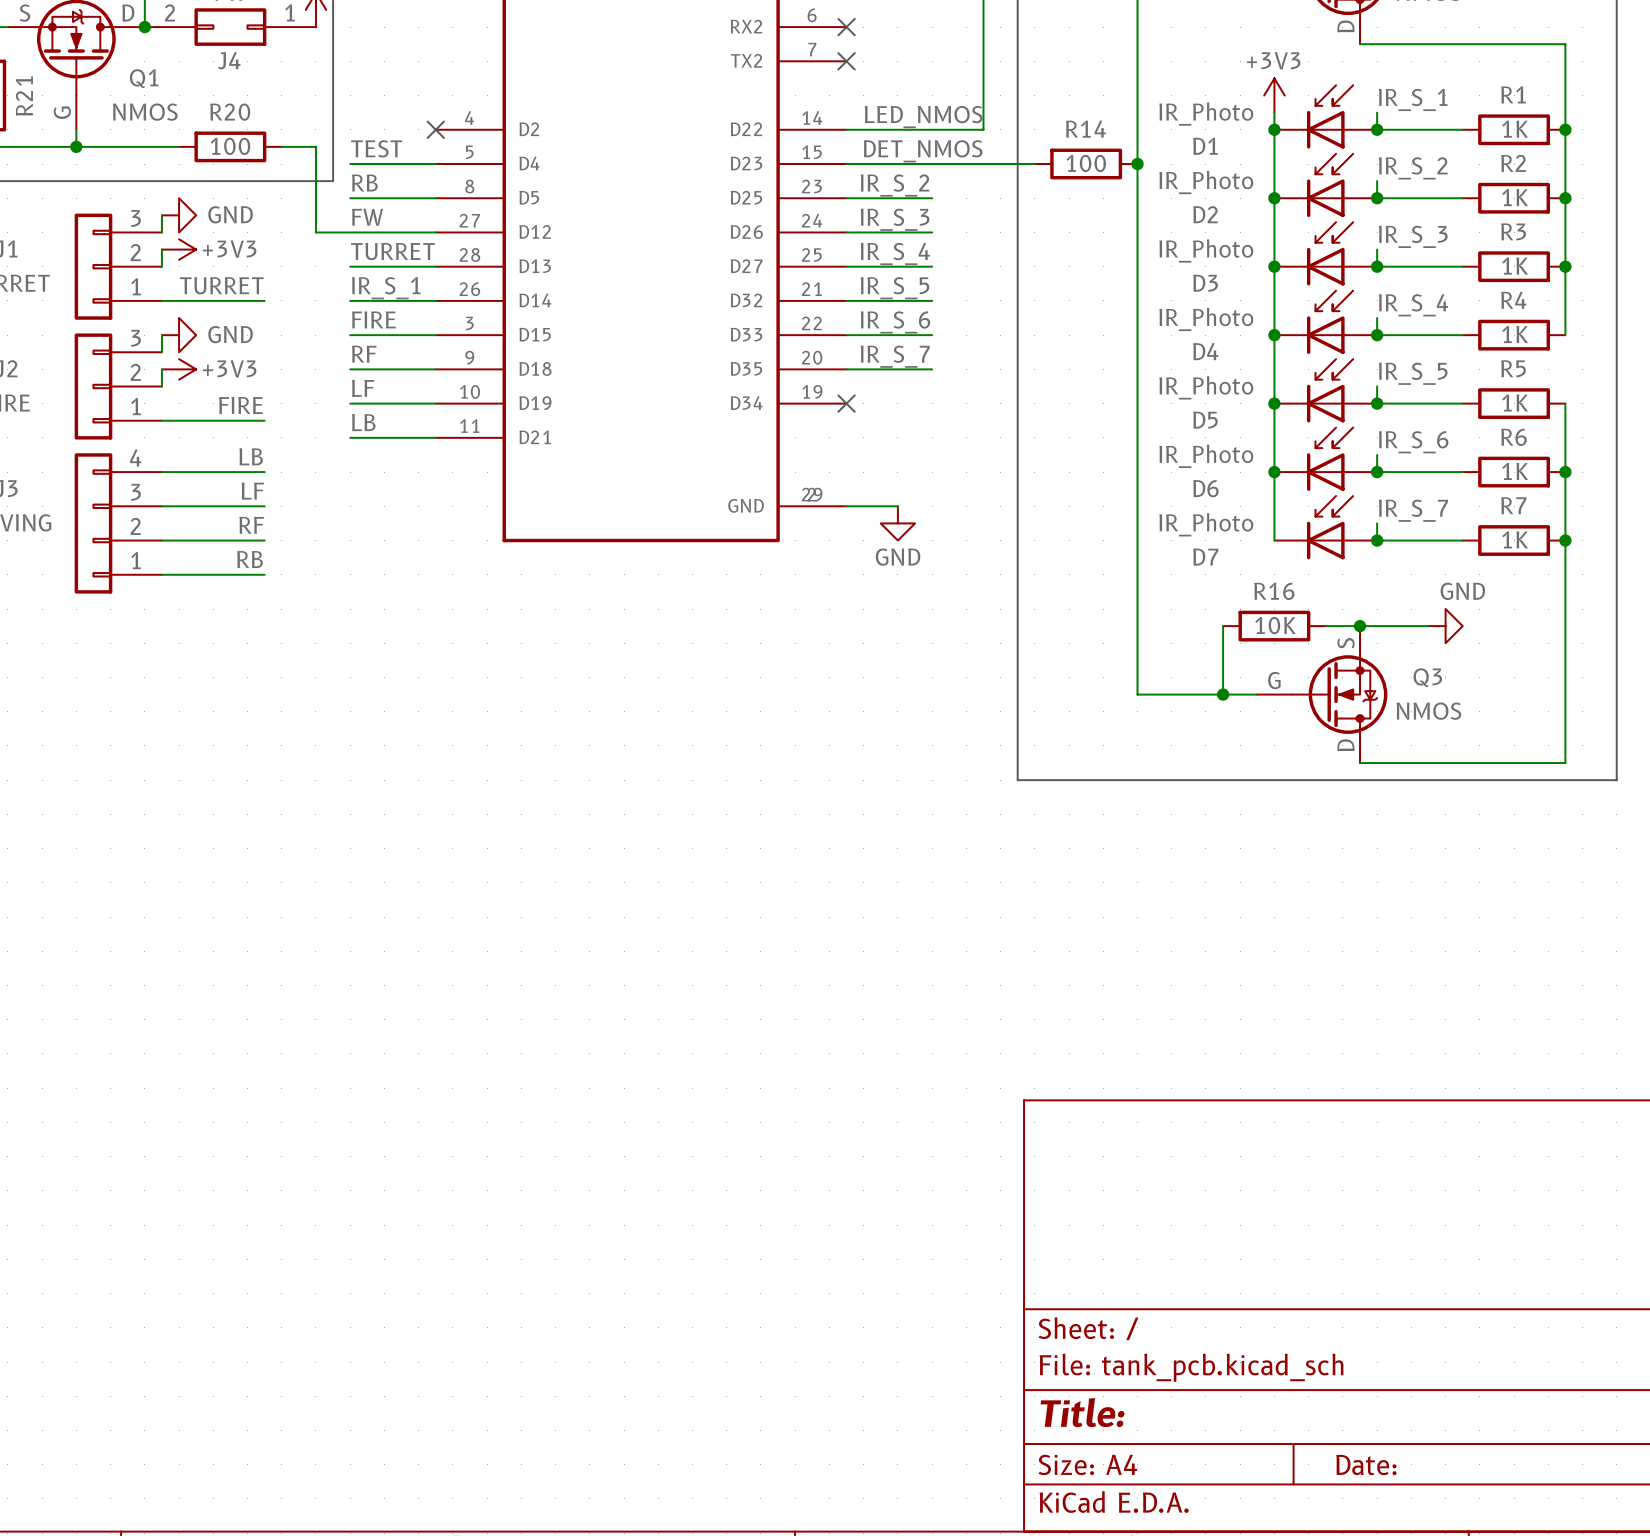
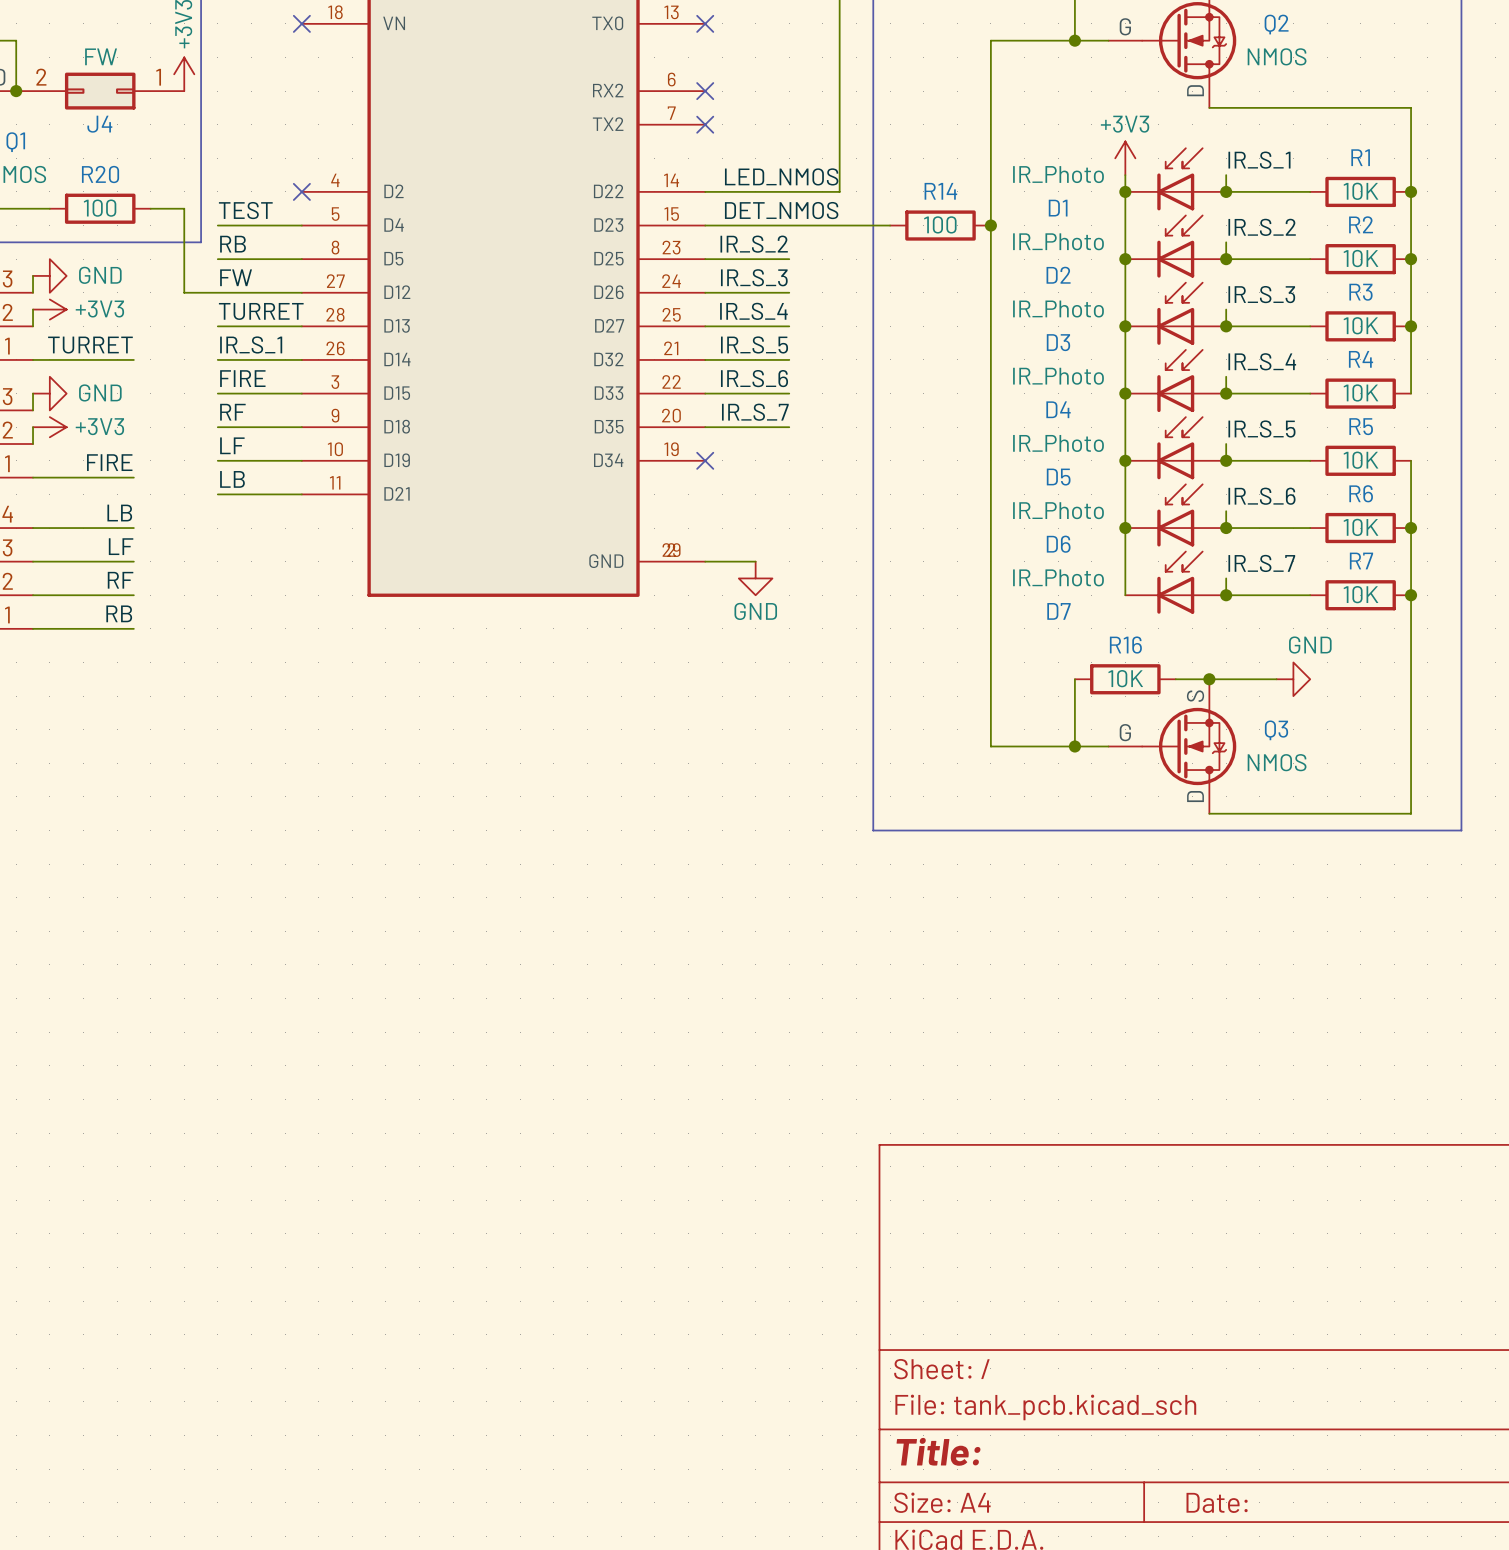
R1 value: 1K (1515, 129) -> 10K (1360, 191)
R2 value: 1K (1515, 197) -> 10K (1360, 258)
R3 value: 1K (1515, 266) -> 10K (1360, 325)
R4 value: 1K (1515, 334) -> 10K (1360, 392)
R5 value: 1K (1515, 402) -> 10K (1360, 460)
R6 value: 1K (1515, 471) -> 10K (1360, 527)
R7 value: 1K (1515, 539) -> 10K (1360, 594)

